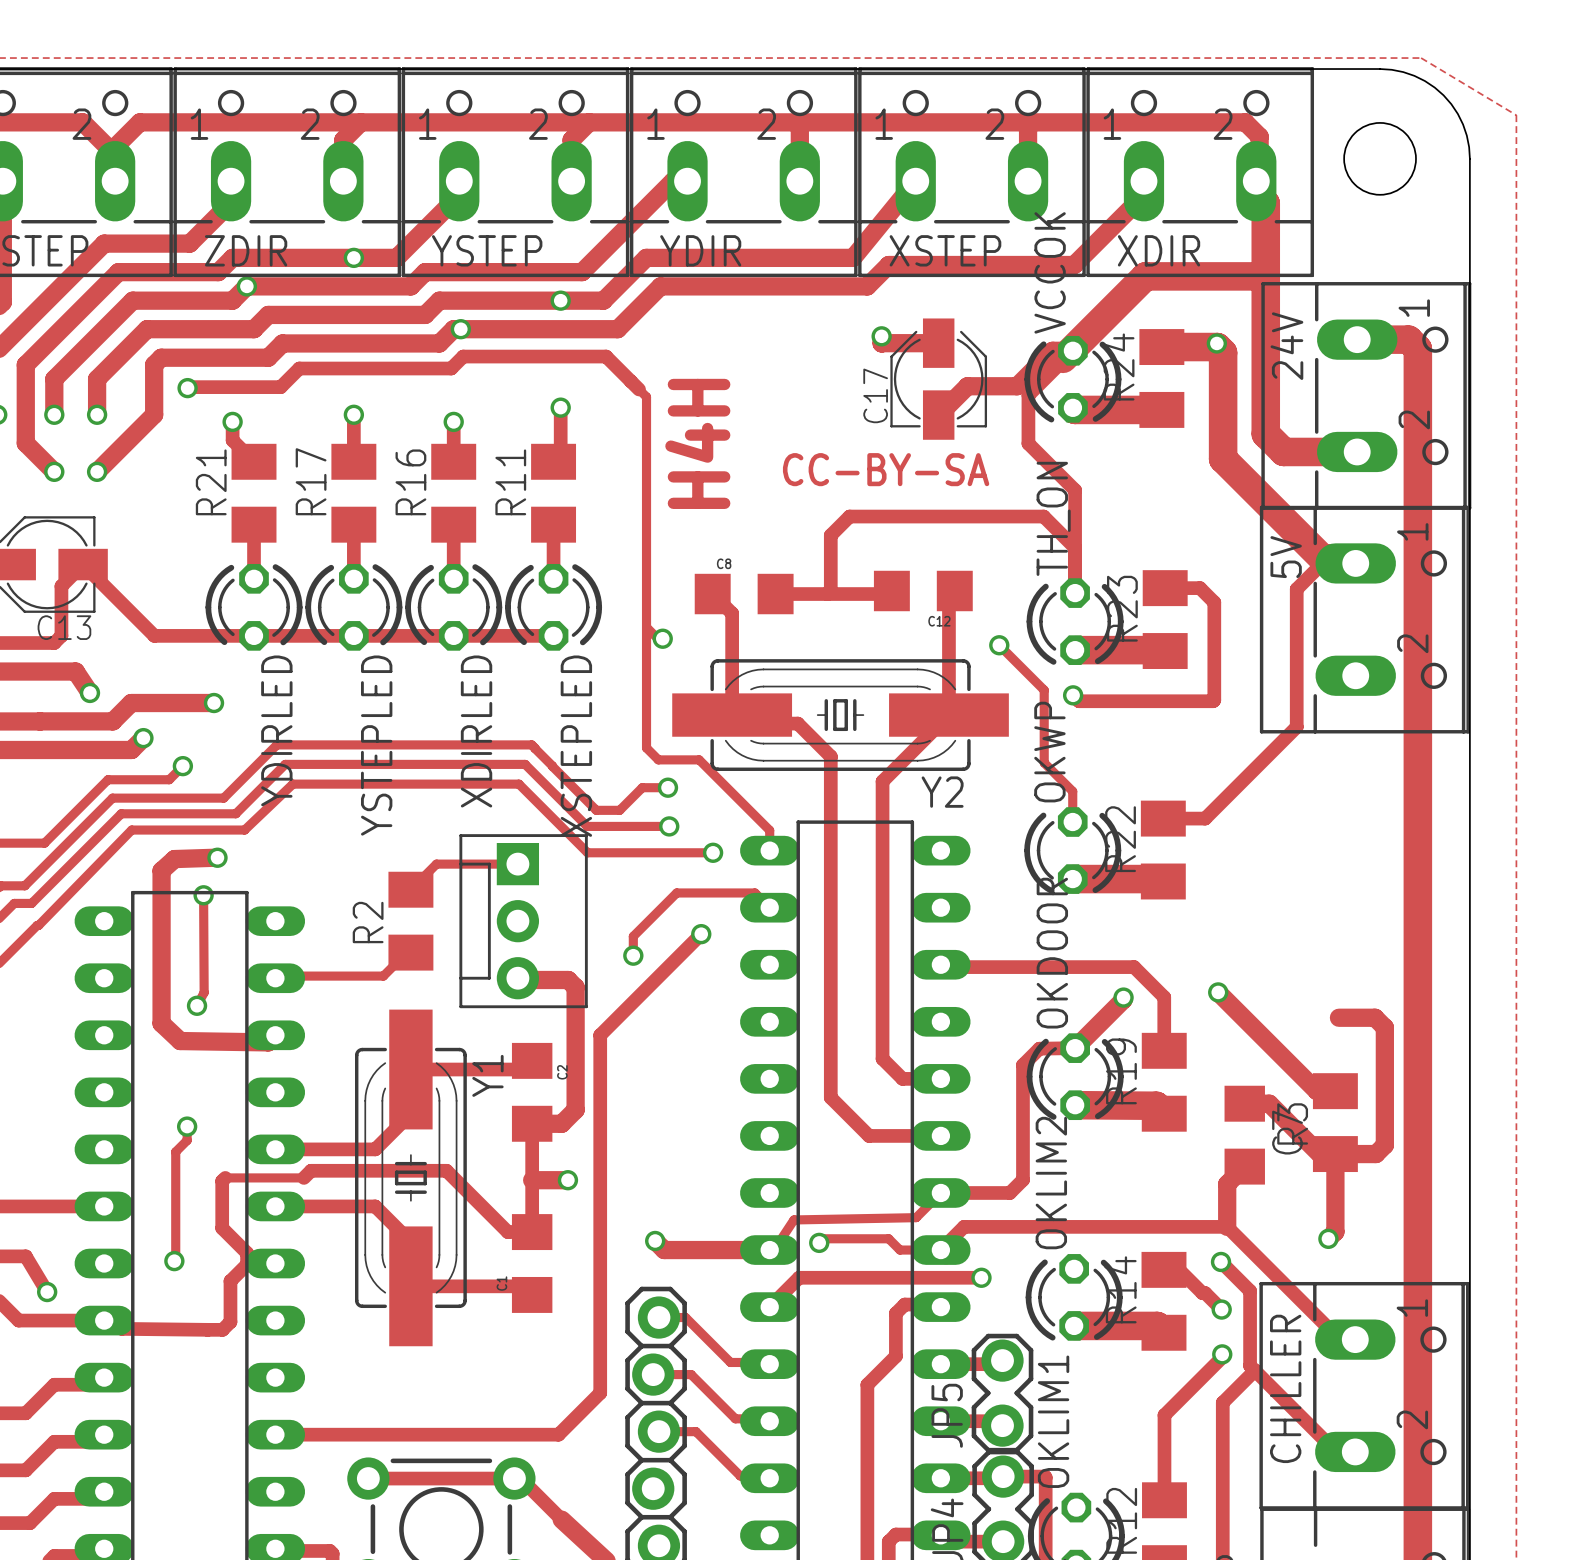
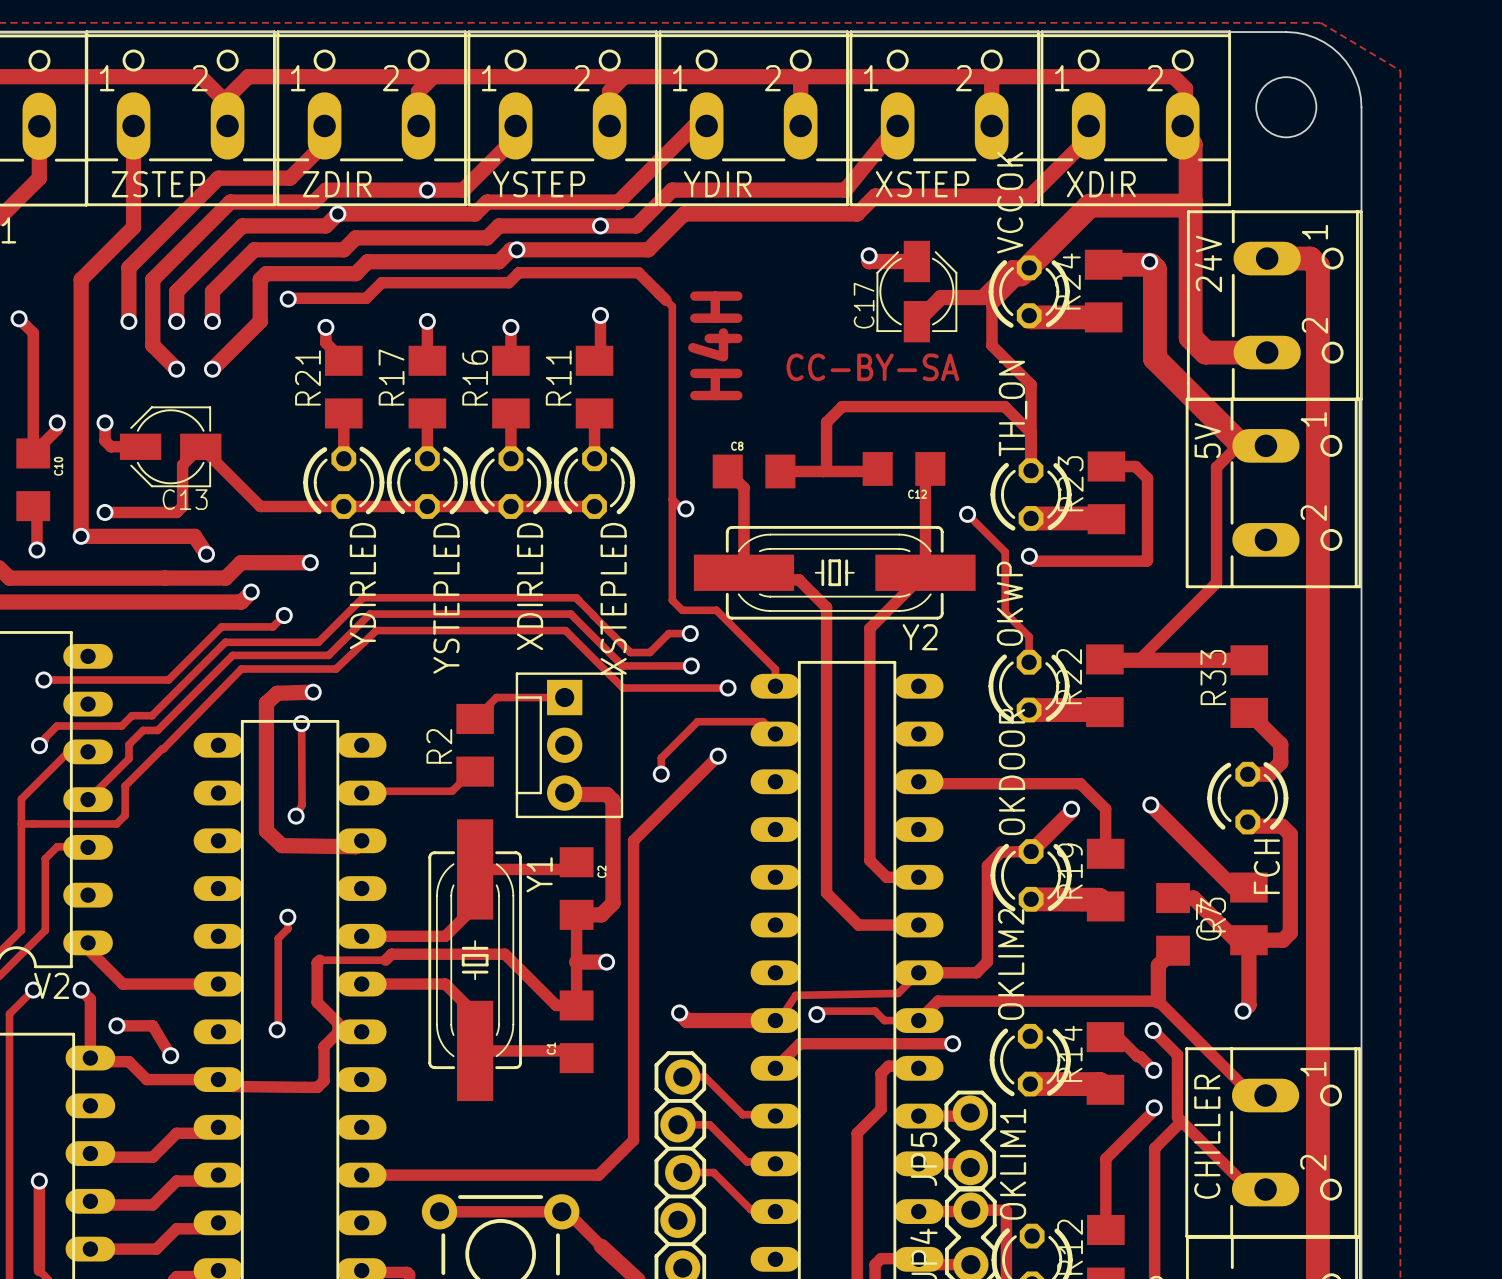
track: none -> (1105, 660) (1249, 660)
R33: none -> (1249, 686)
track: none -> (1249, 712) (1280, 744) (1280, 762) (1269, 774) (1247, 774)
FCH: none -> (1247, 798)

